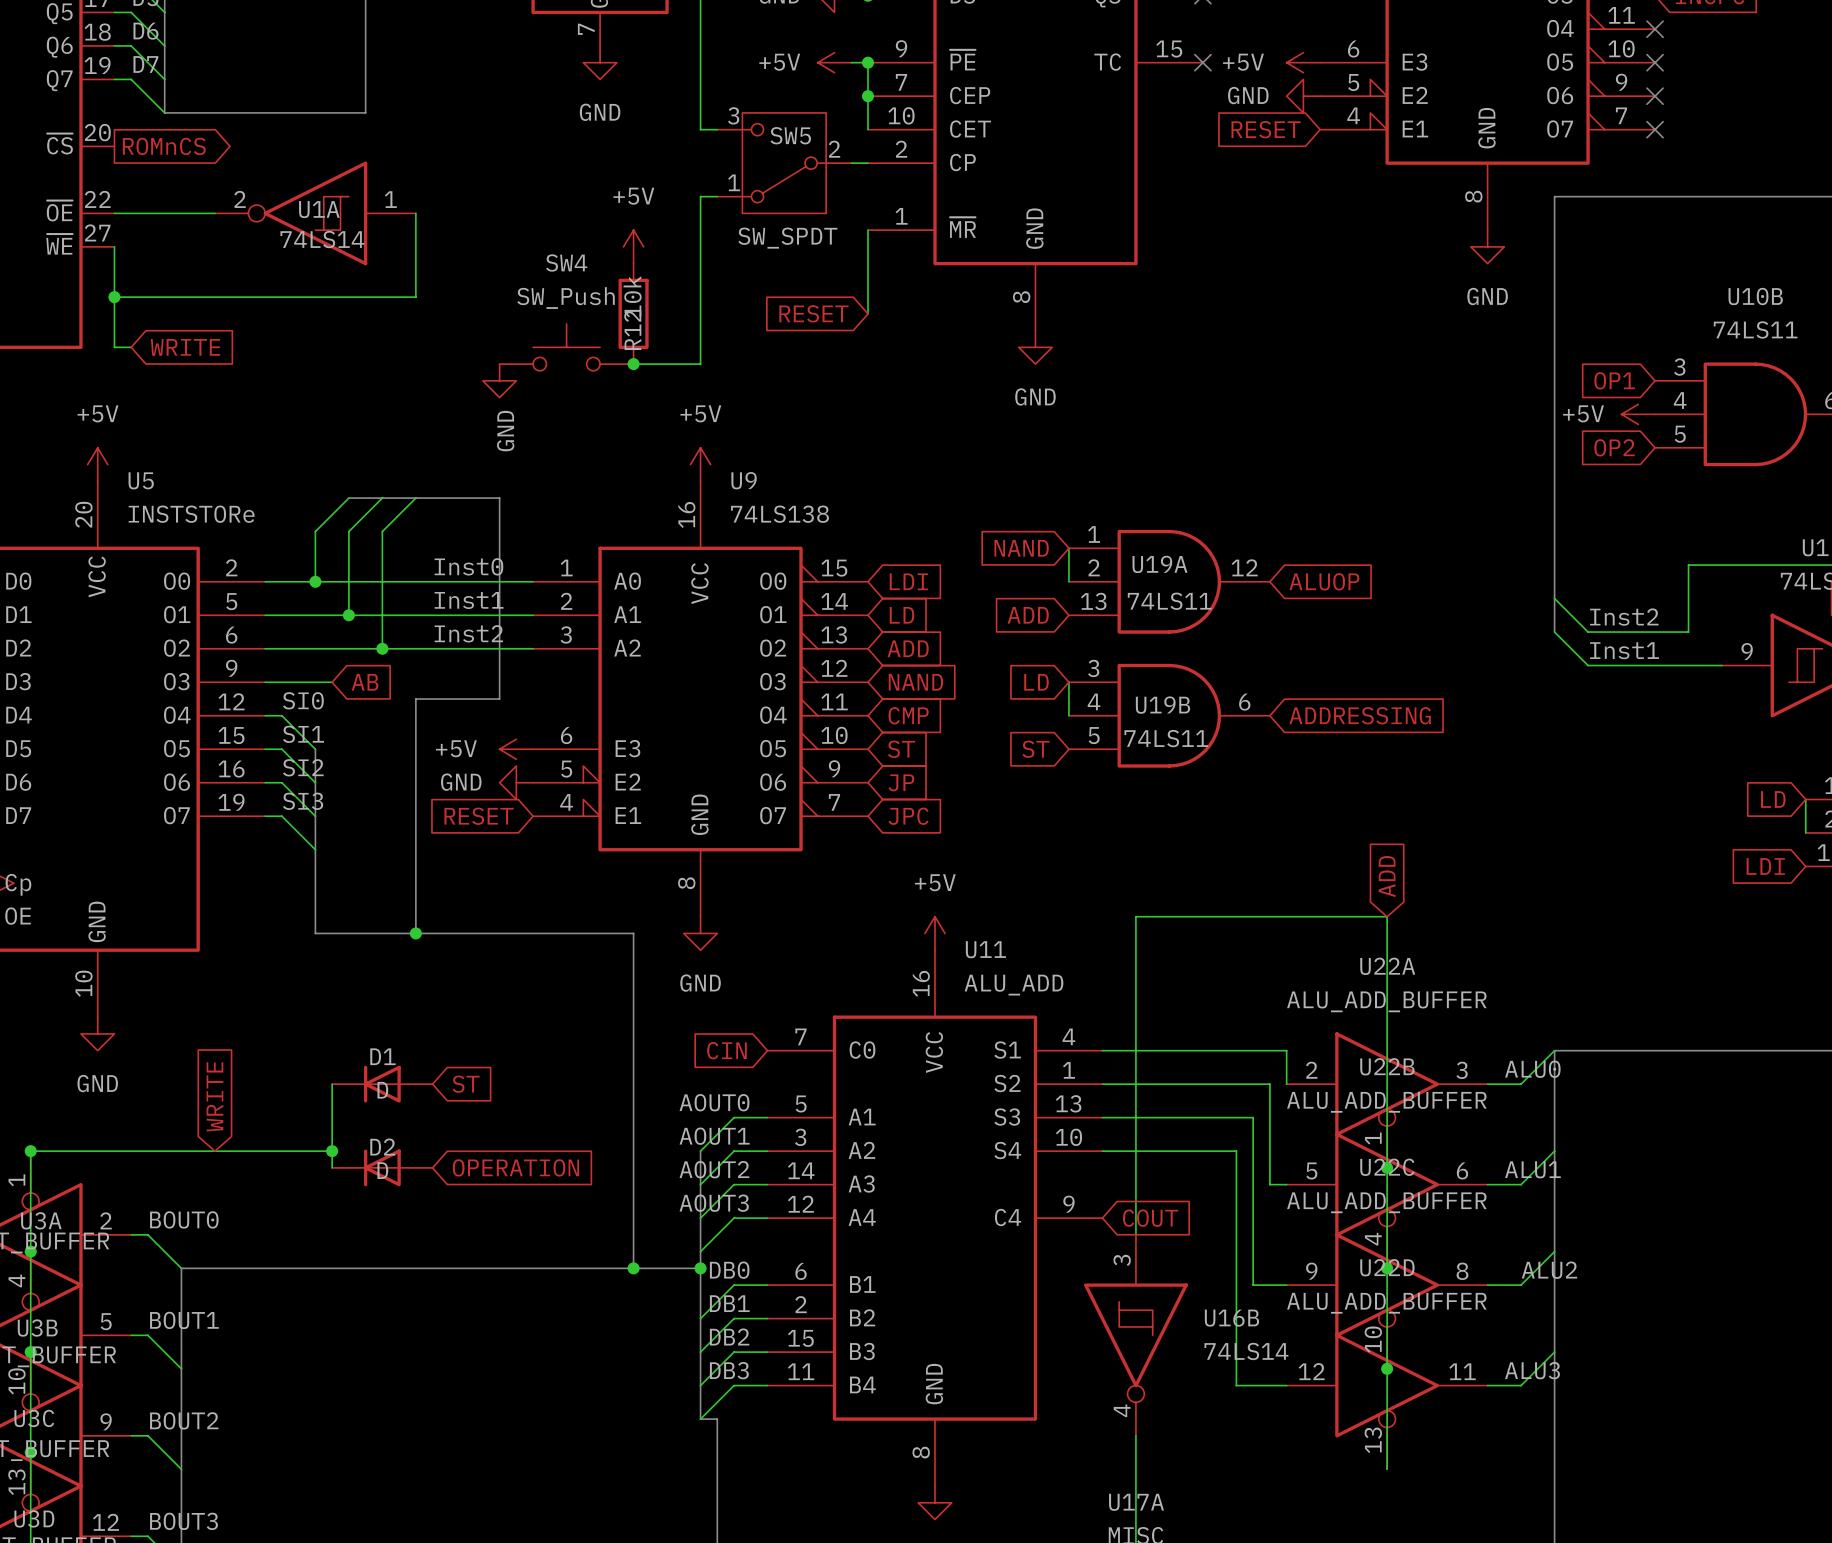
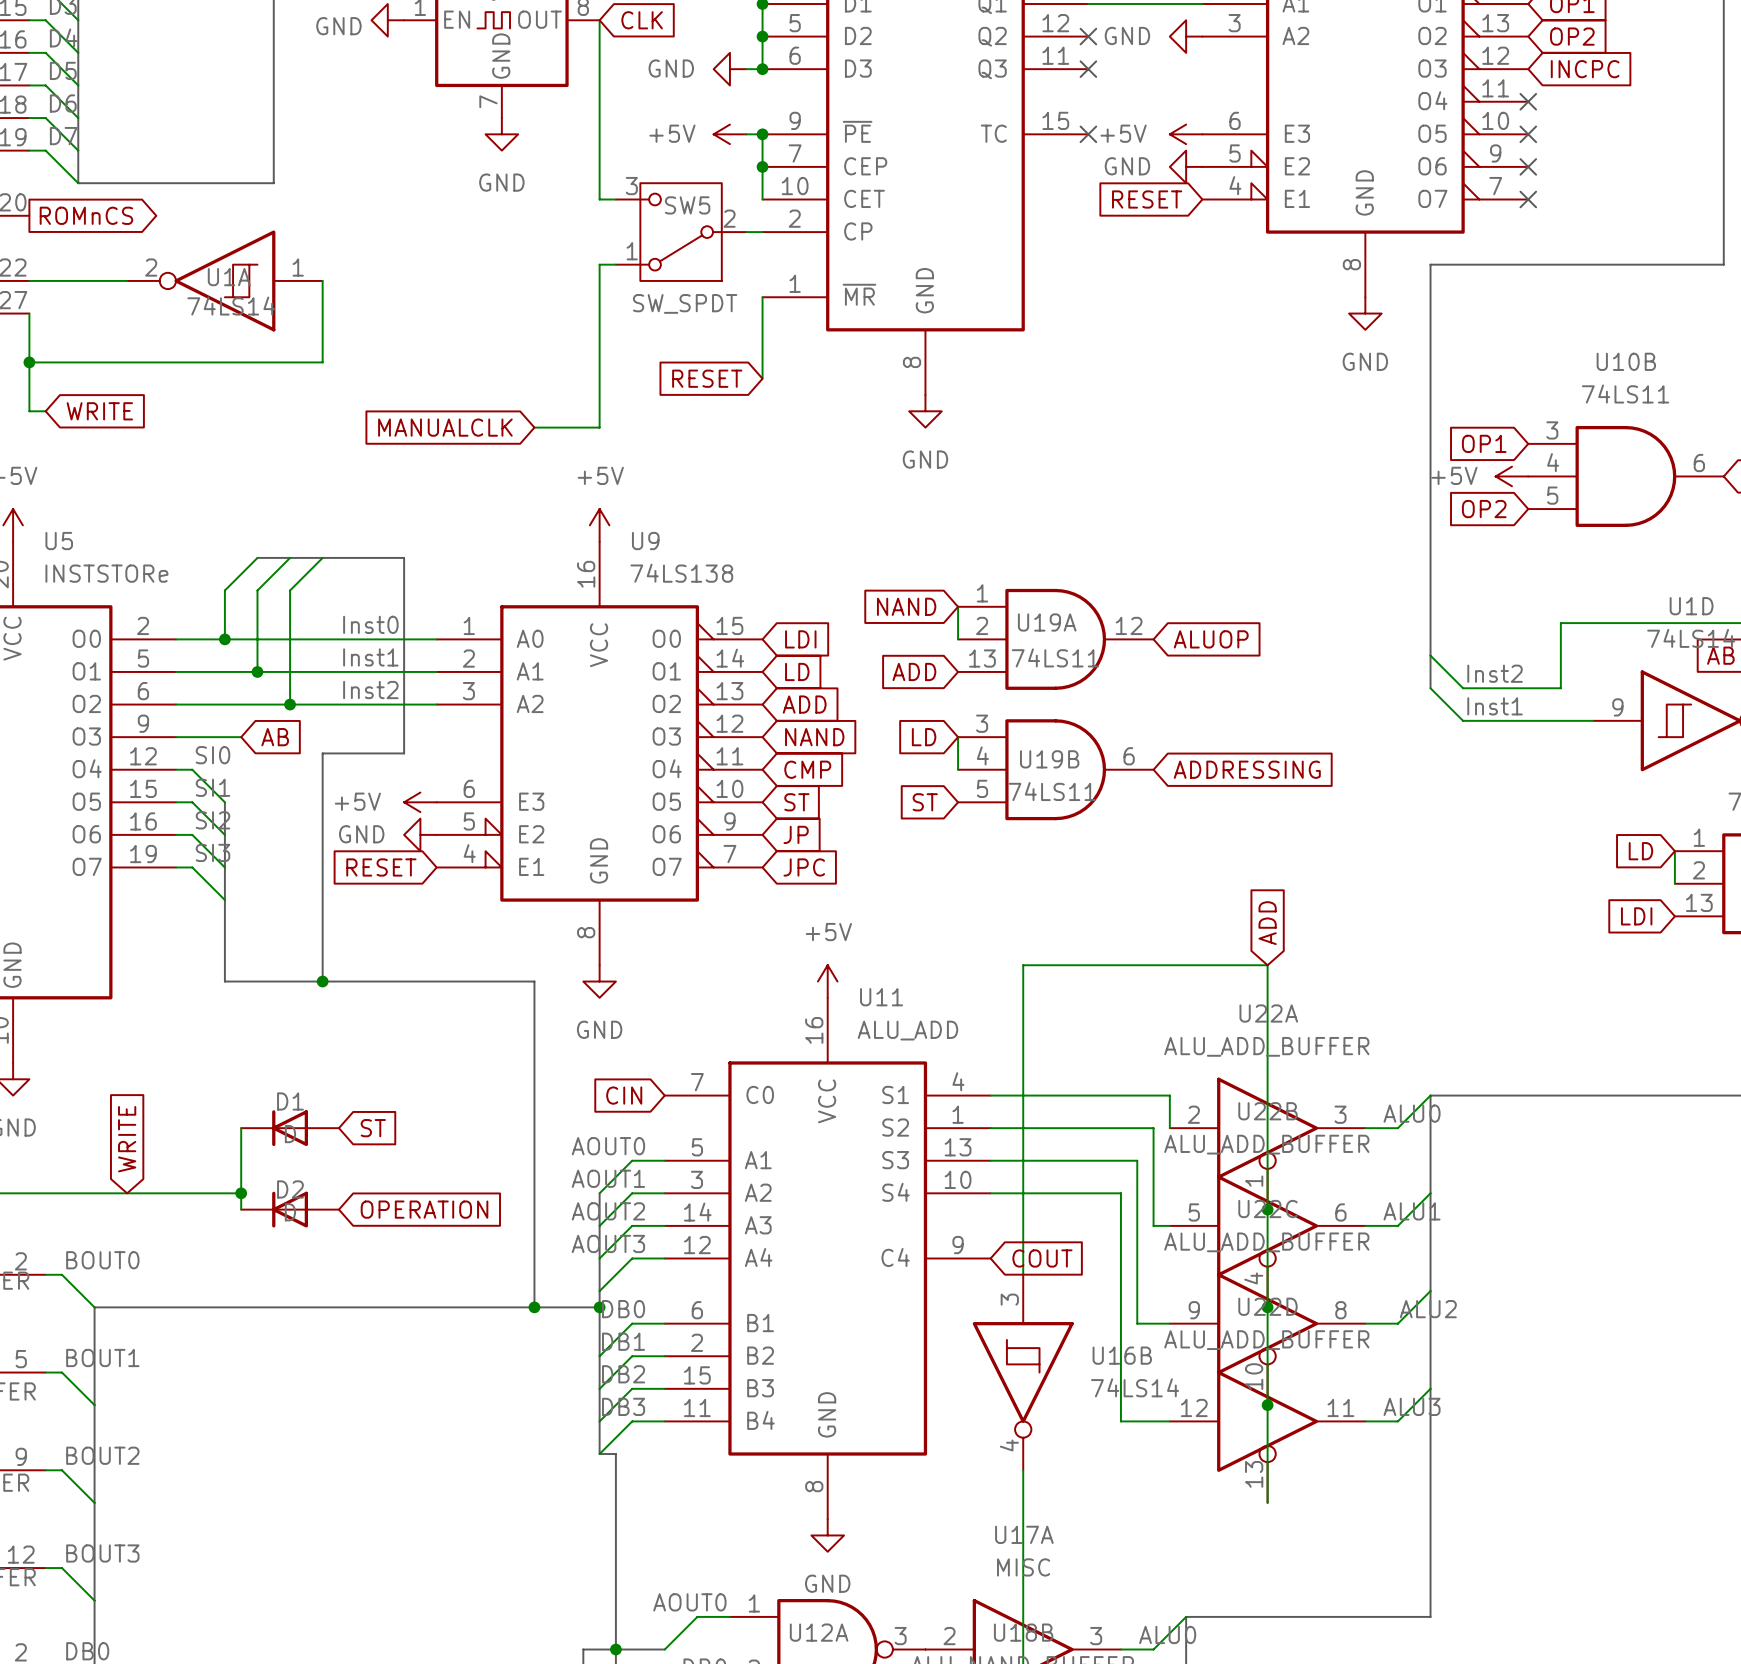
power symbol: +5V (633, 246) -> none
R12: 10k (633, 313) -> none
SW4: SW_Push (566, 347) -> none
global label: none -> MANUALCLK (445, 427)
junction: (633, 364) -> none
power symbol: GND (499, 380) -> none

